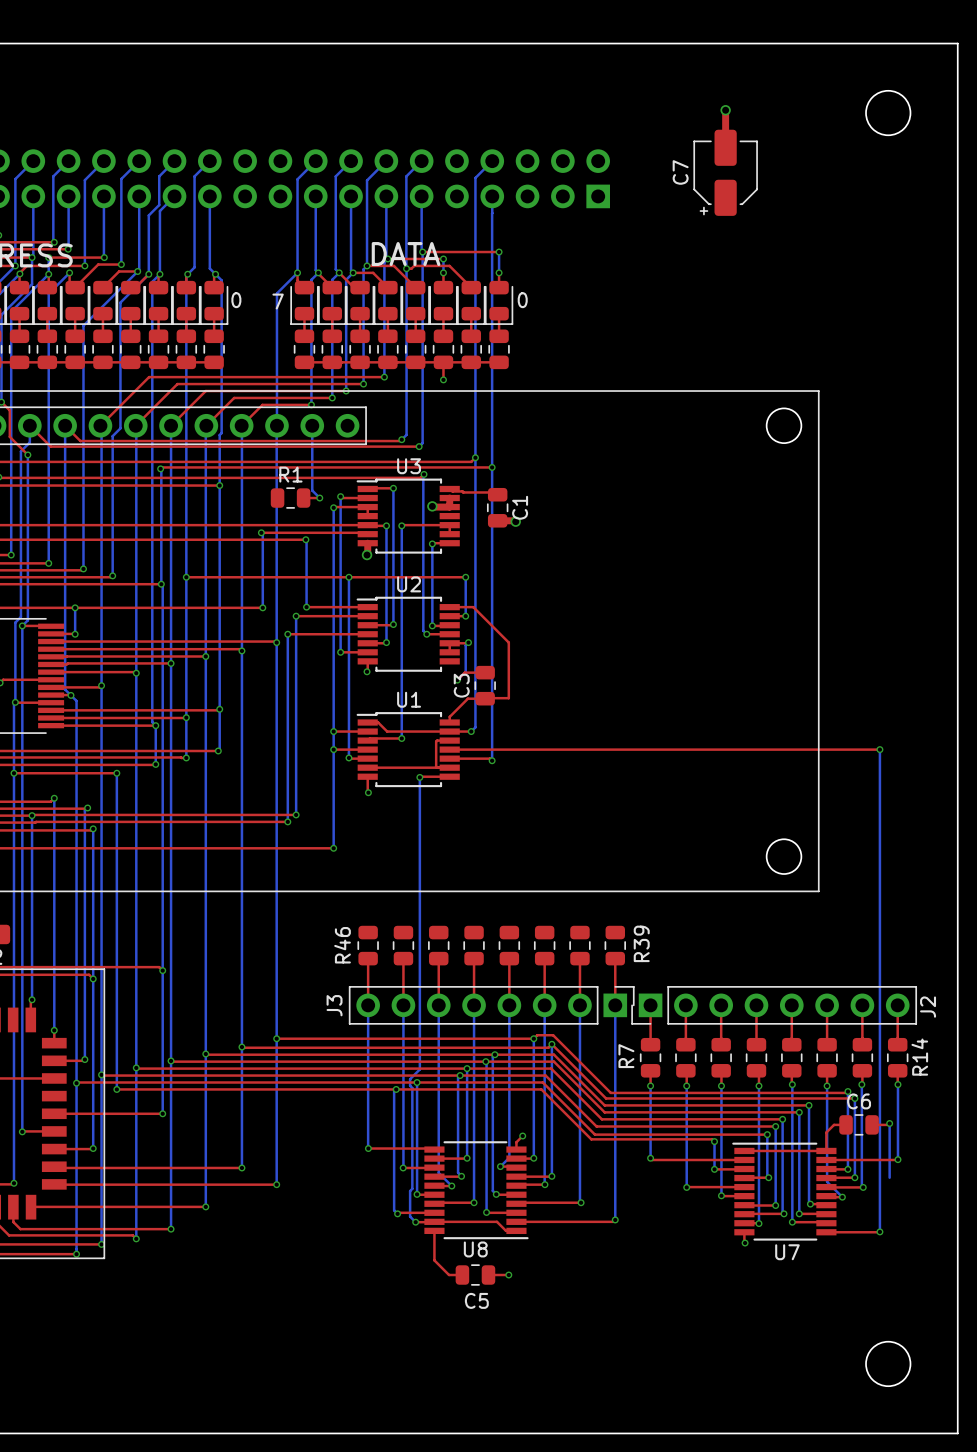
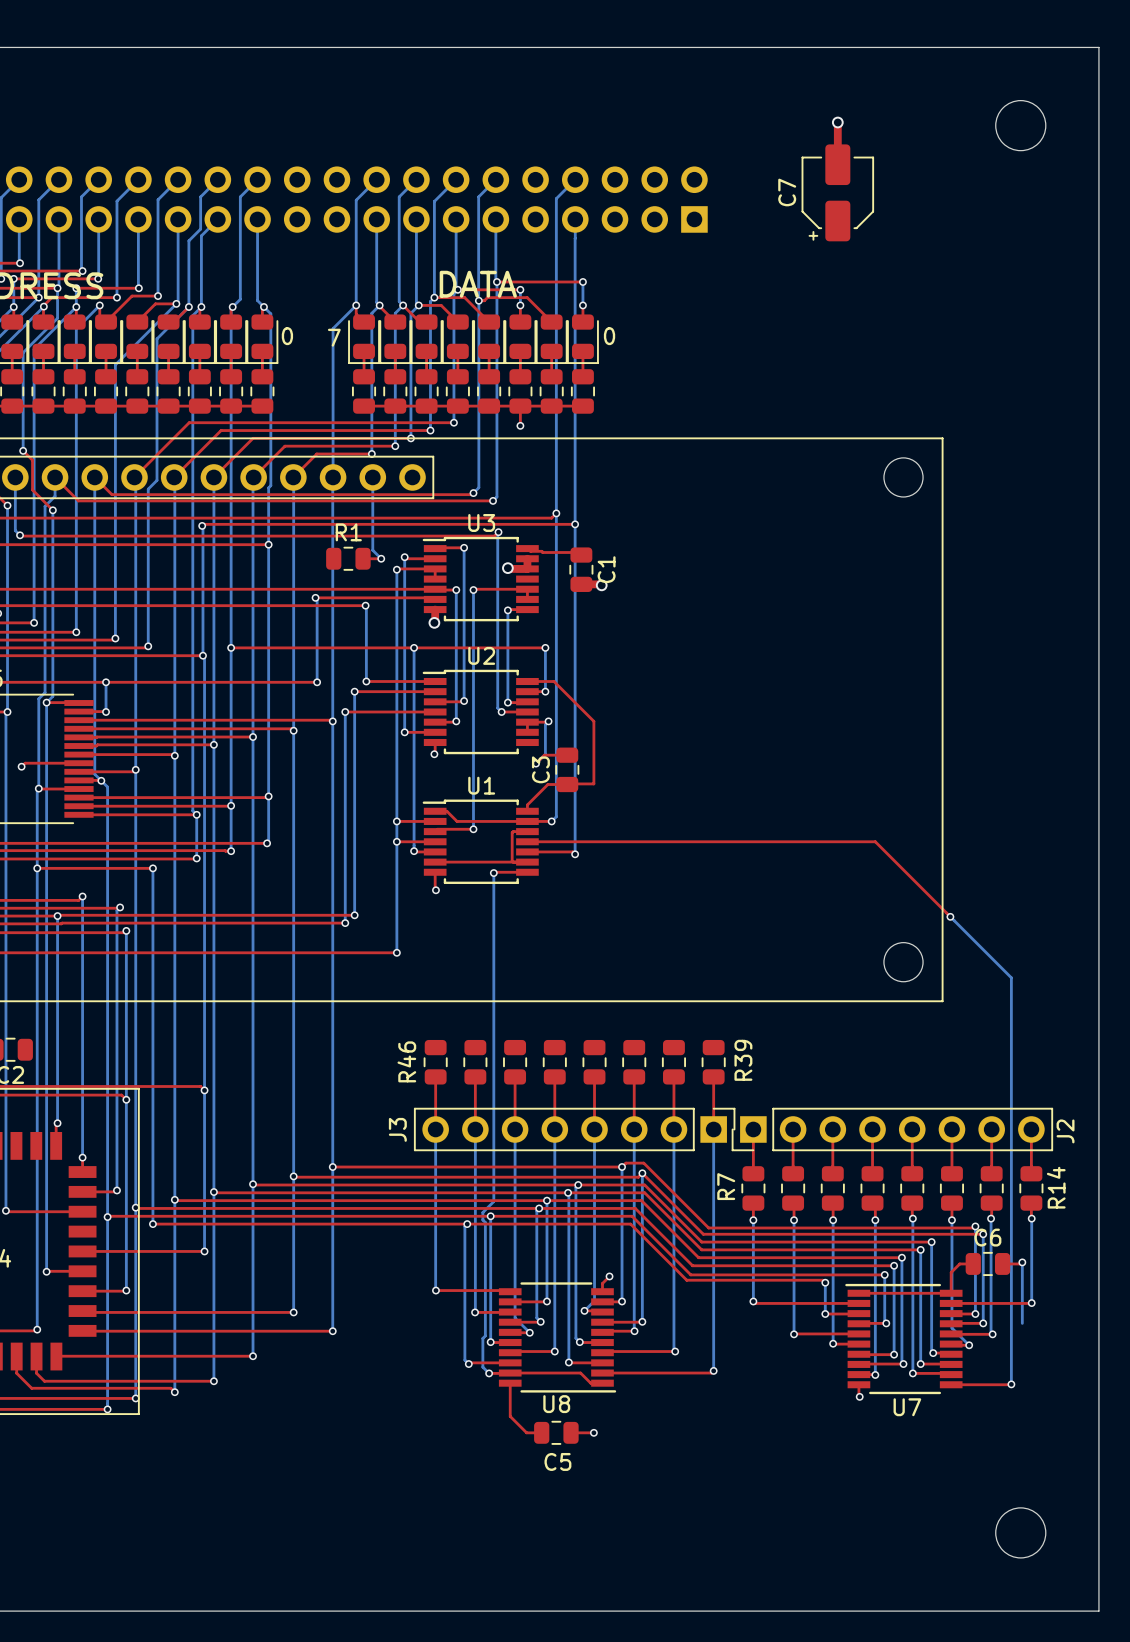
top track: (758, 749) (879, 749) -> (875, 841) (950, 916)
bottom track: (879, 749) (879, 870) -> (950, 916) (1011, 977)
via: (879, 749) -> none
via: none -> (950, 916)

